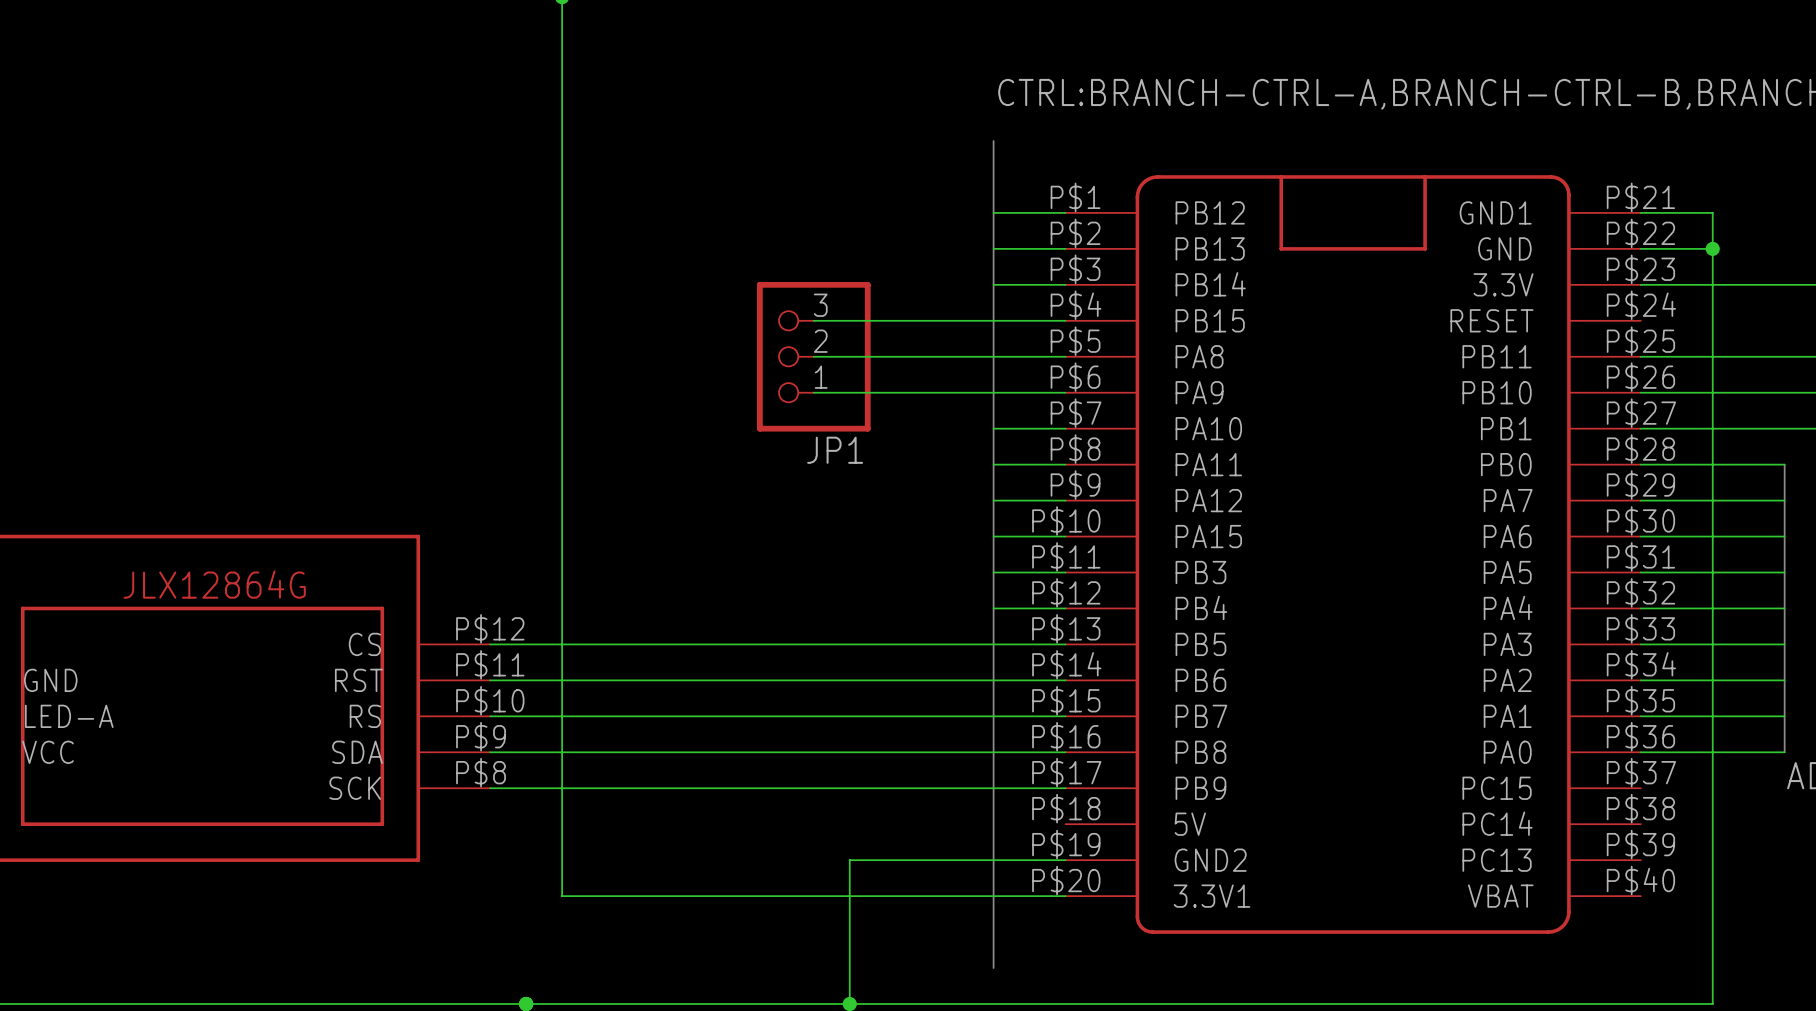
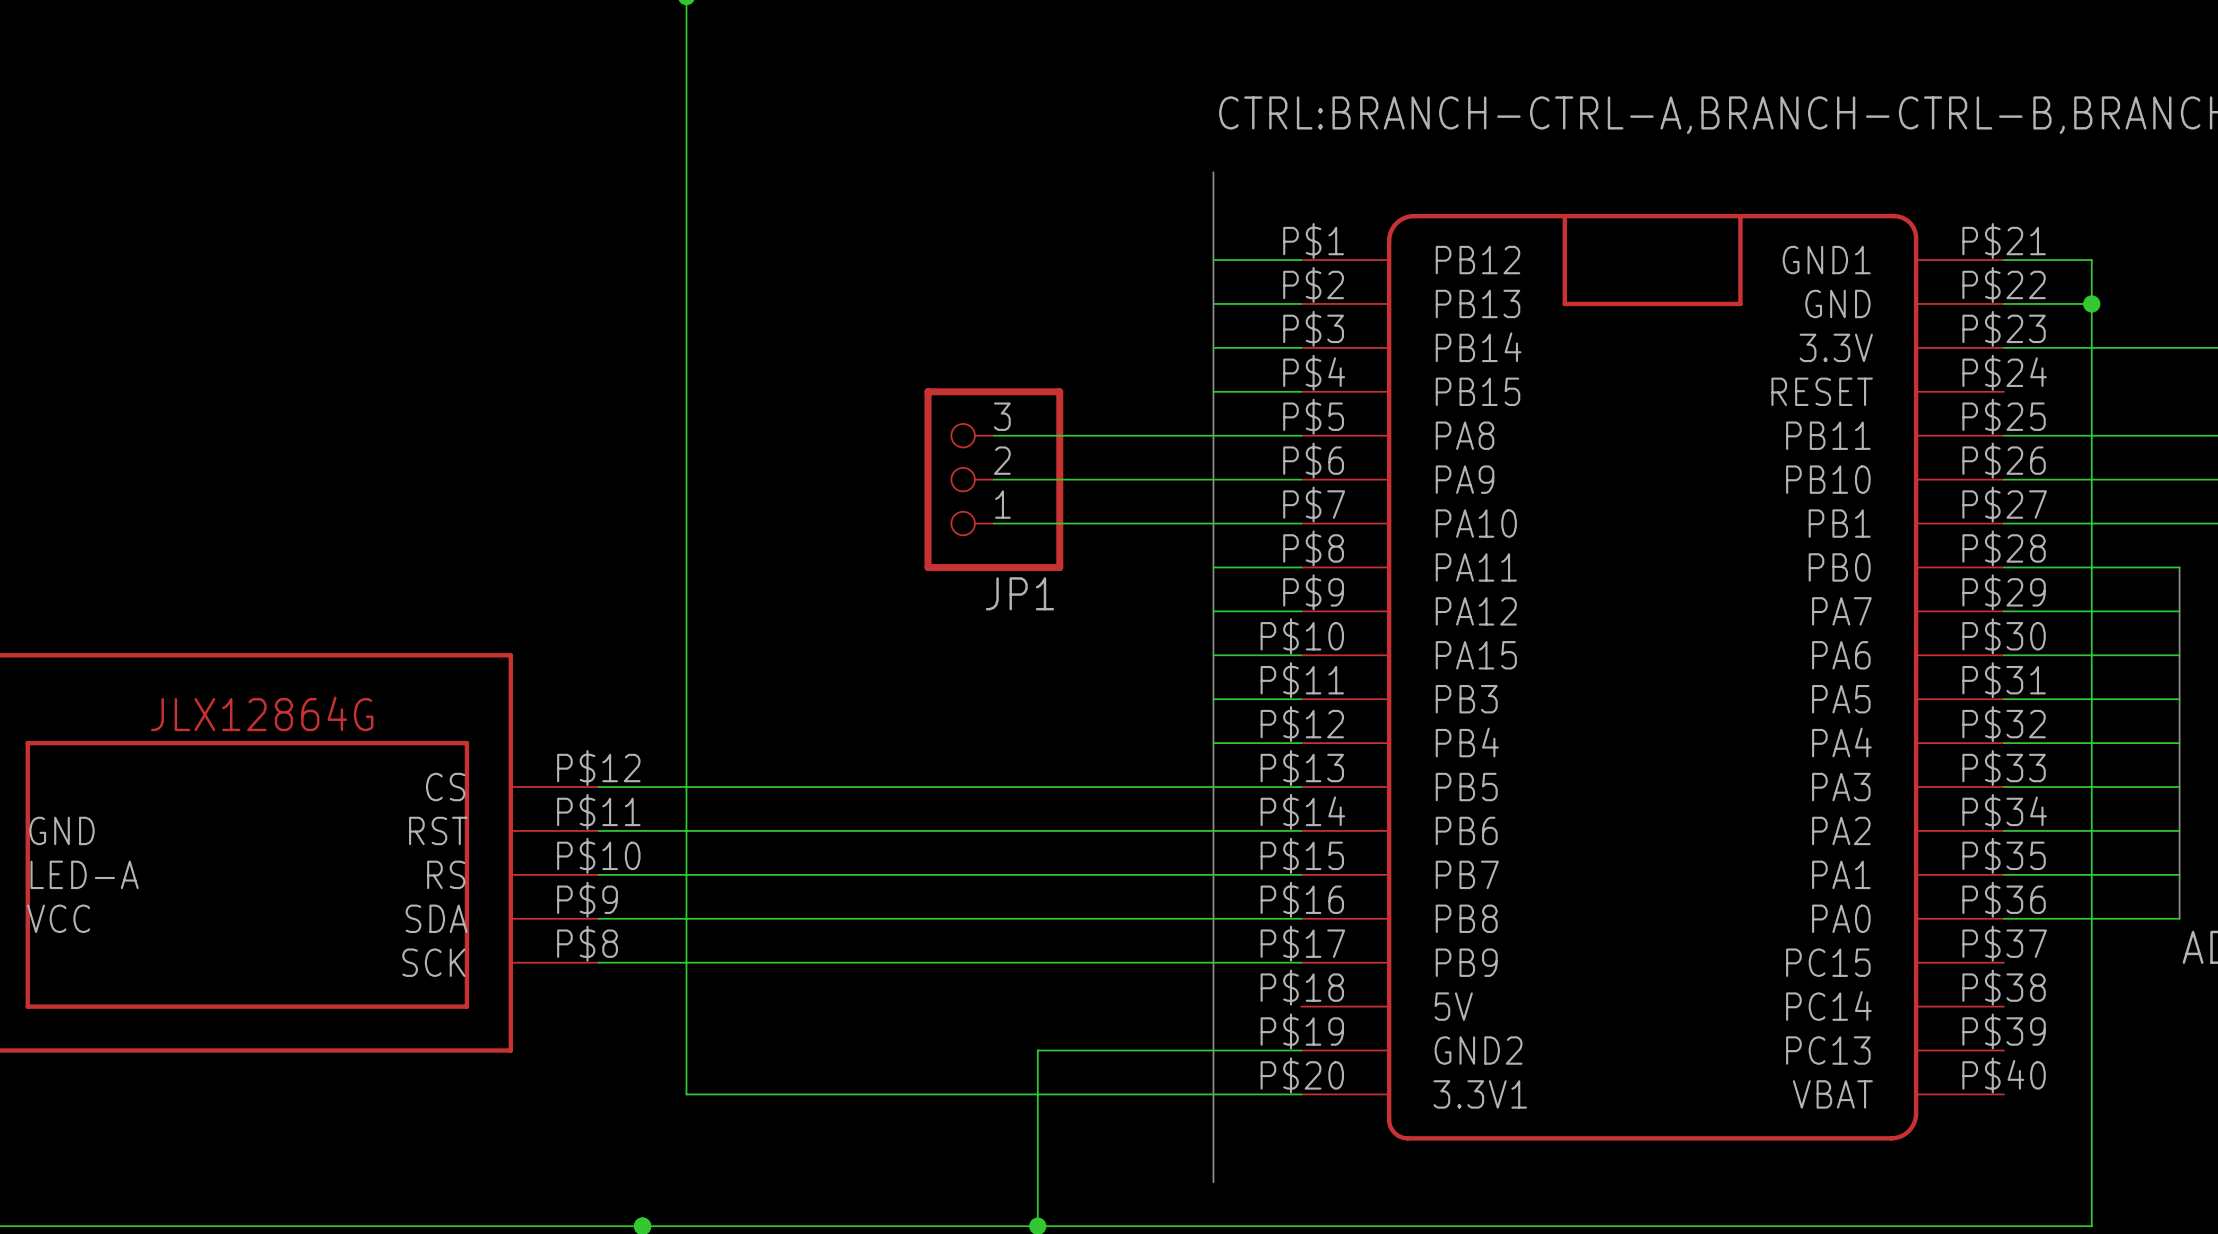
wire: (813, 320) (993, 320) -> (993, 523) (1213, 523)
JP1 position: (813, 356) -> (993, 479)

